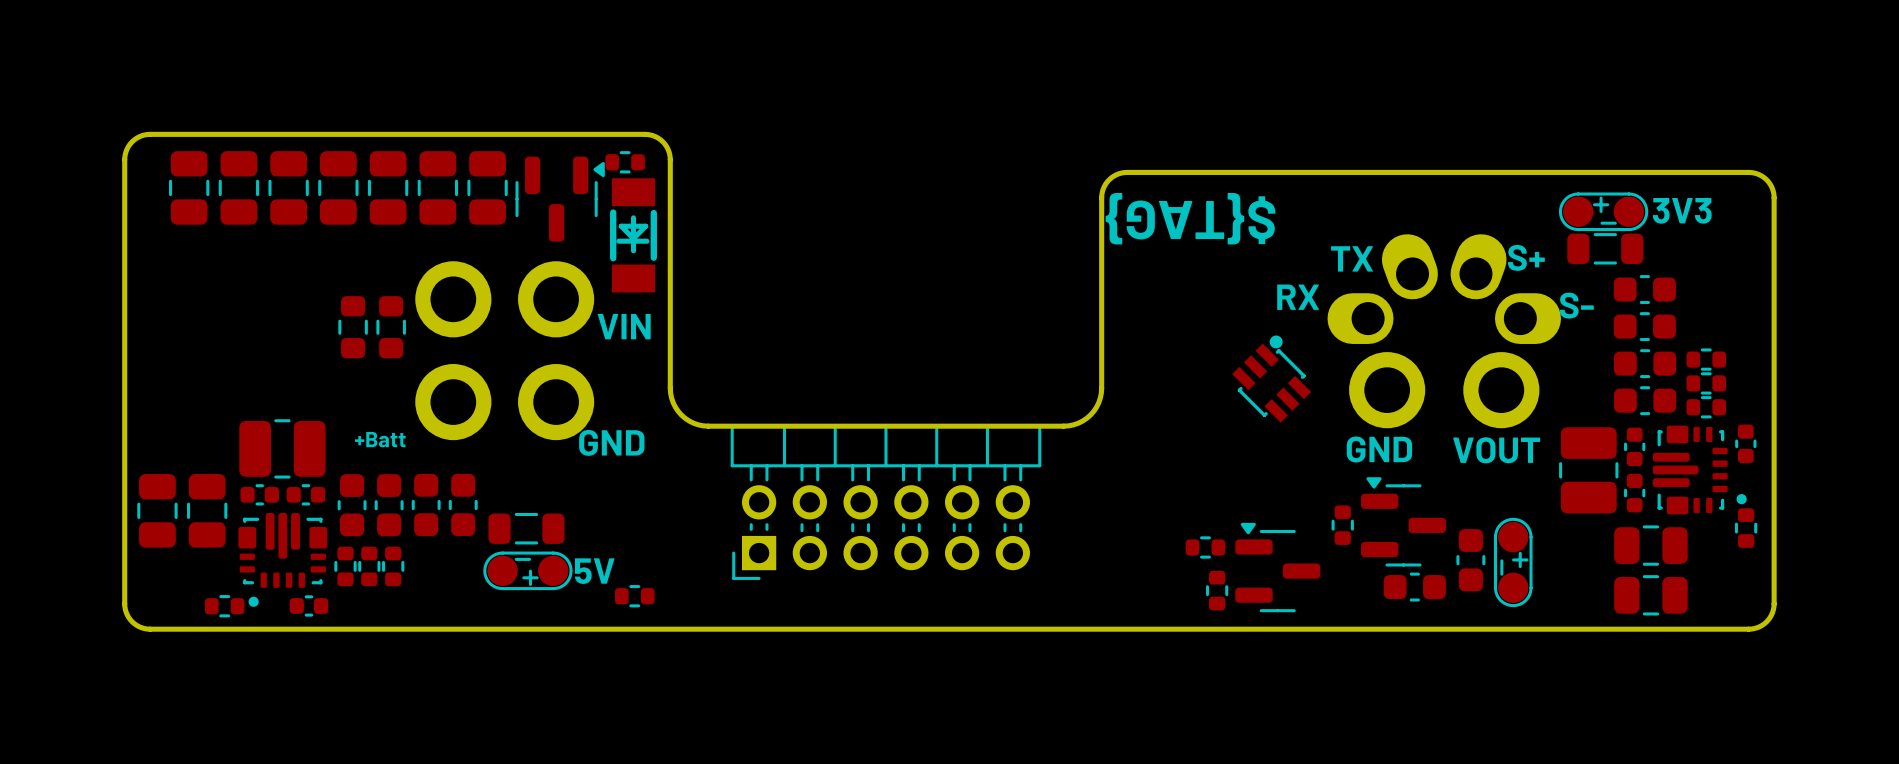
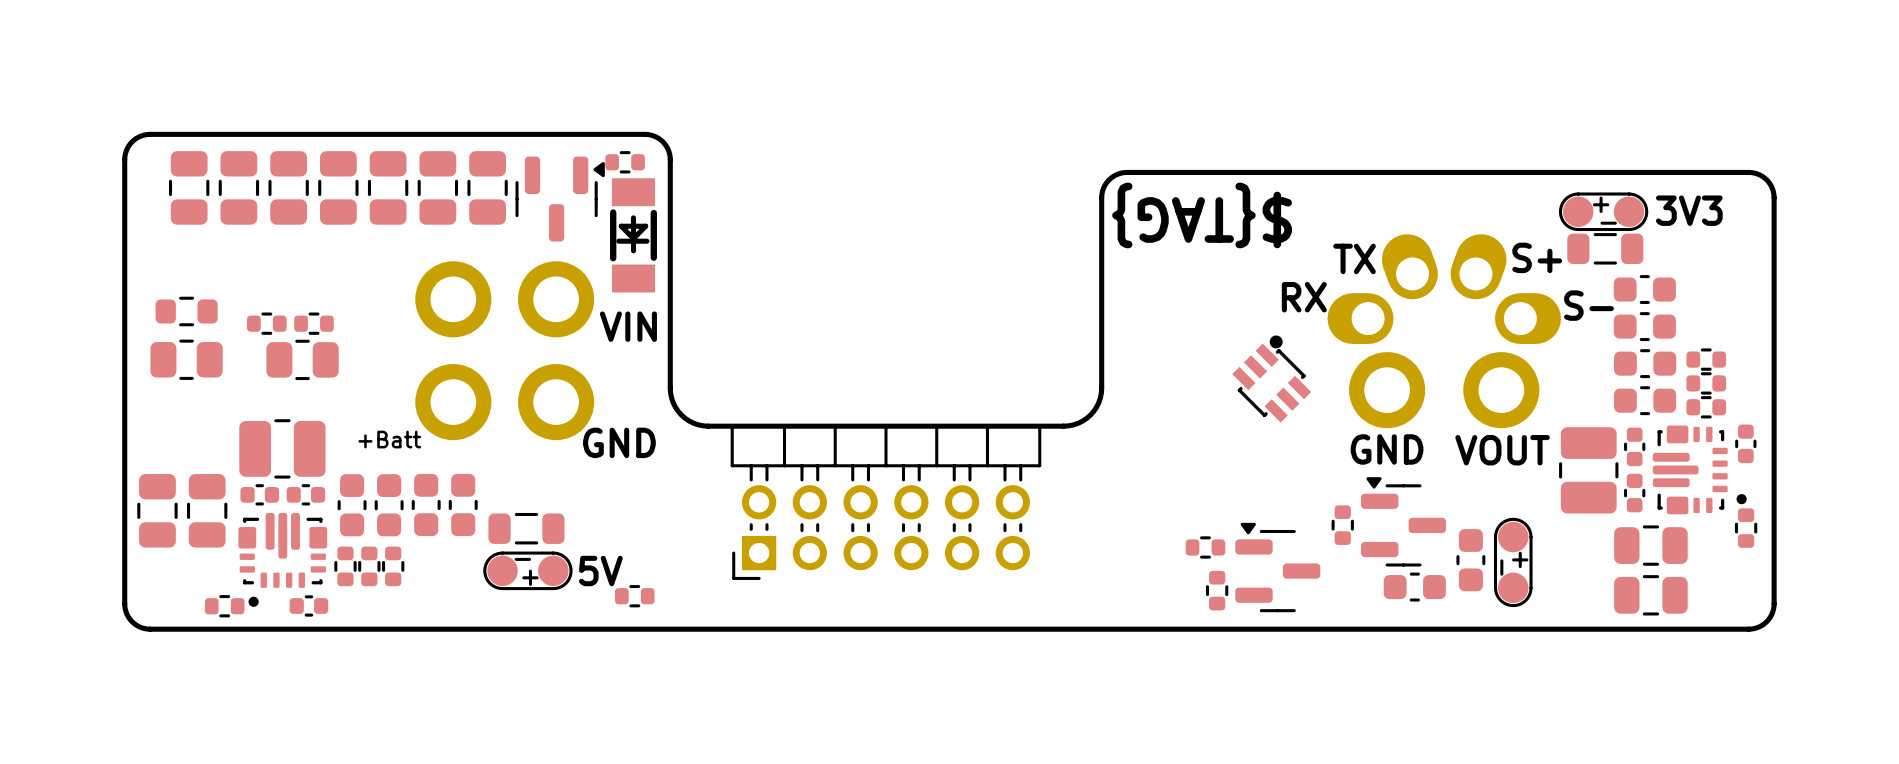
part: none -> (186, 311)
part: none -> (266, 323)
part: none -> (314, 323)
part: (353, 327) -> none
part: (391, 327) -> none
part: none -> (186, 359)
part: none -> (302, 359)

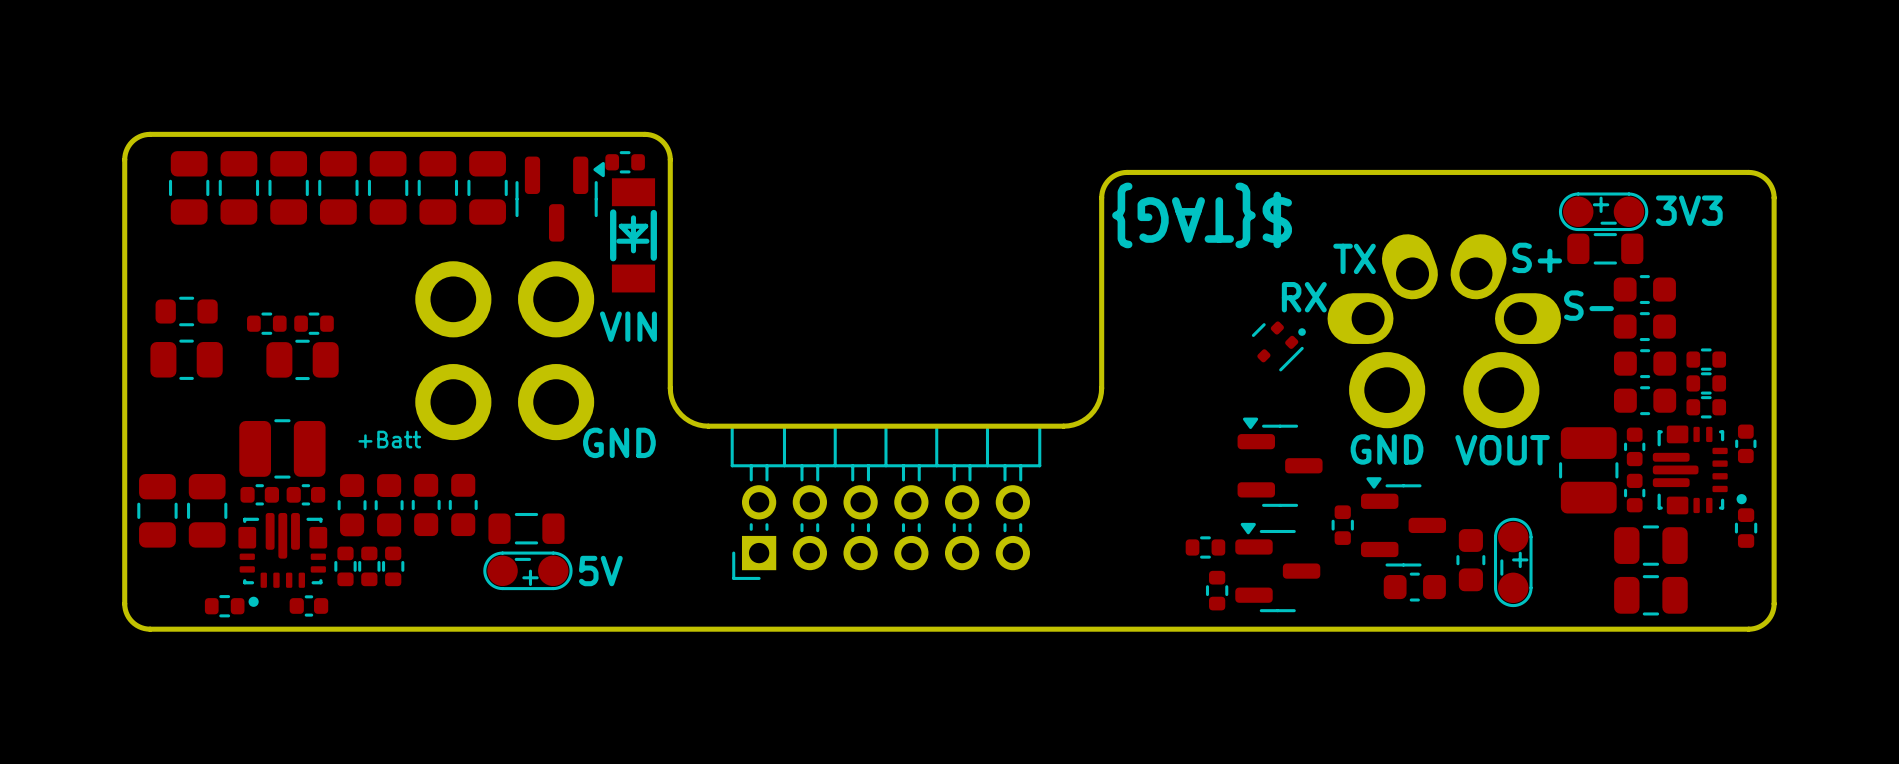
part: none -> (1278, 346)
part: (1271, 379) -> none
part: none -> (1280, 462)
part: (634, 596) -> none

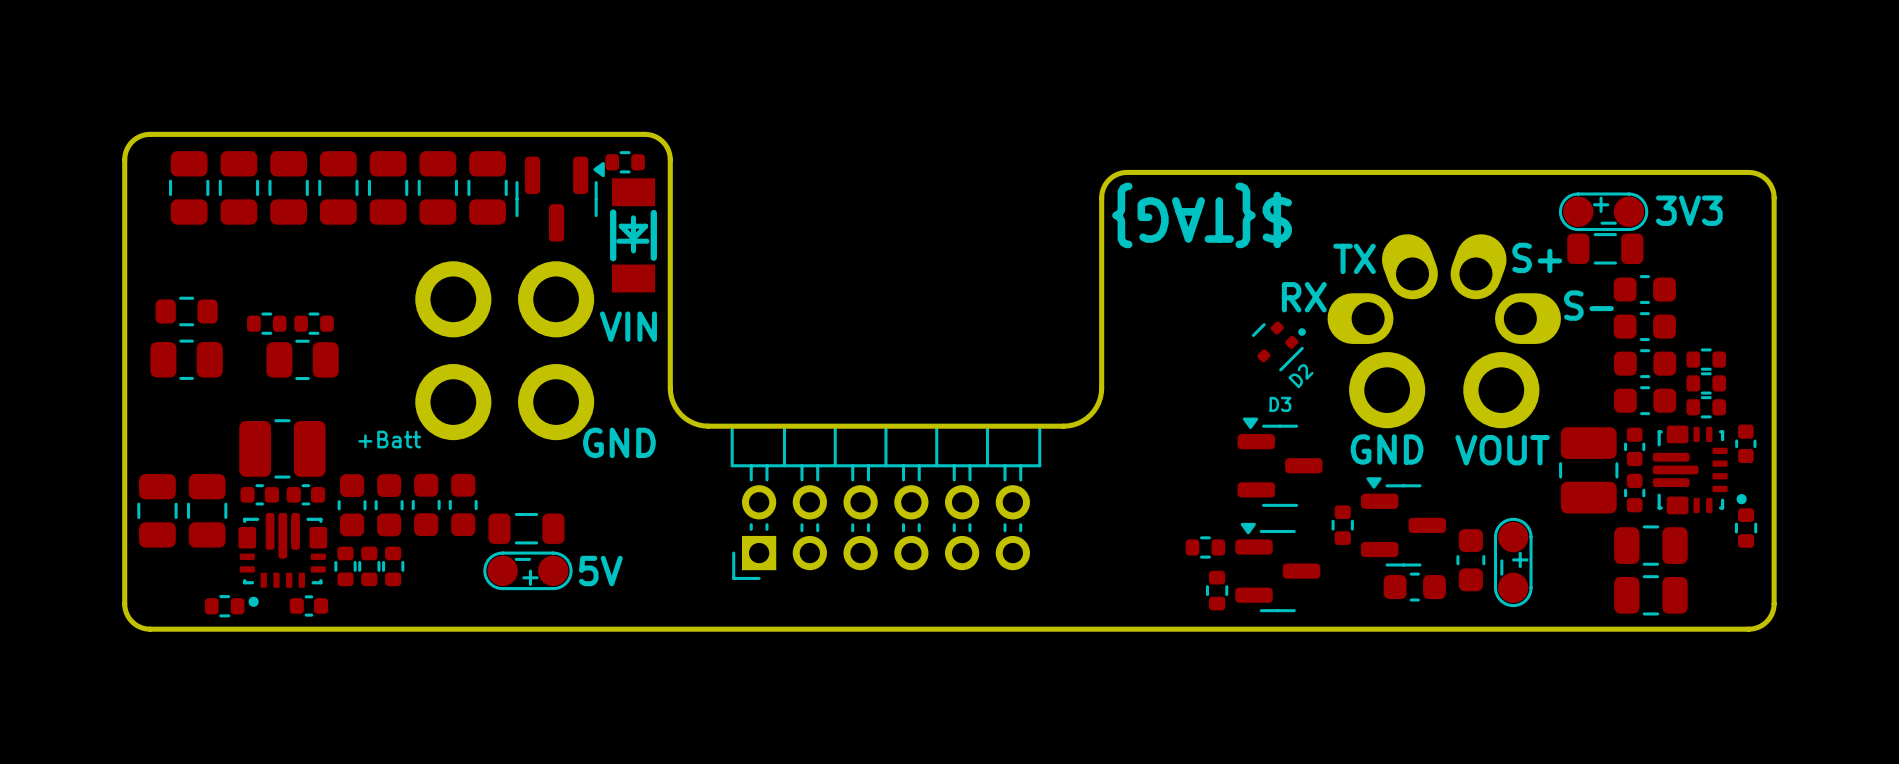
D2 name: none -> D2 (1301, 376)
D3 name: none -> D3 (1280, 404)

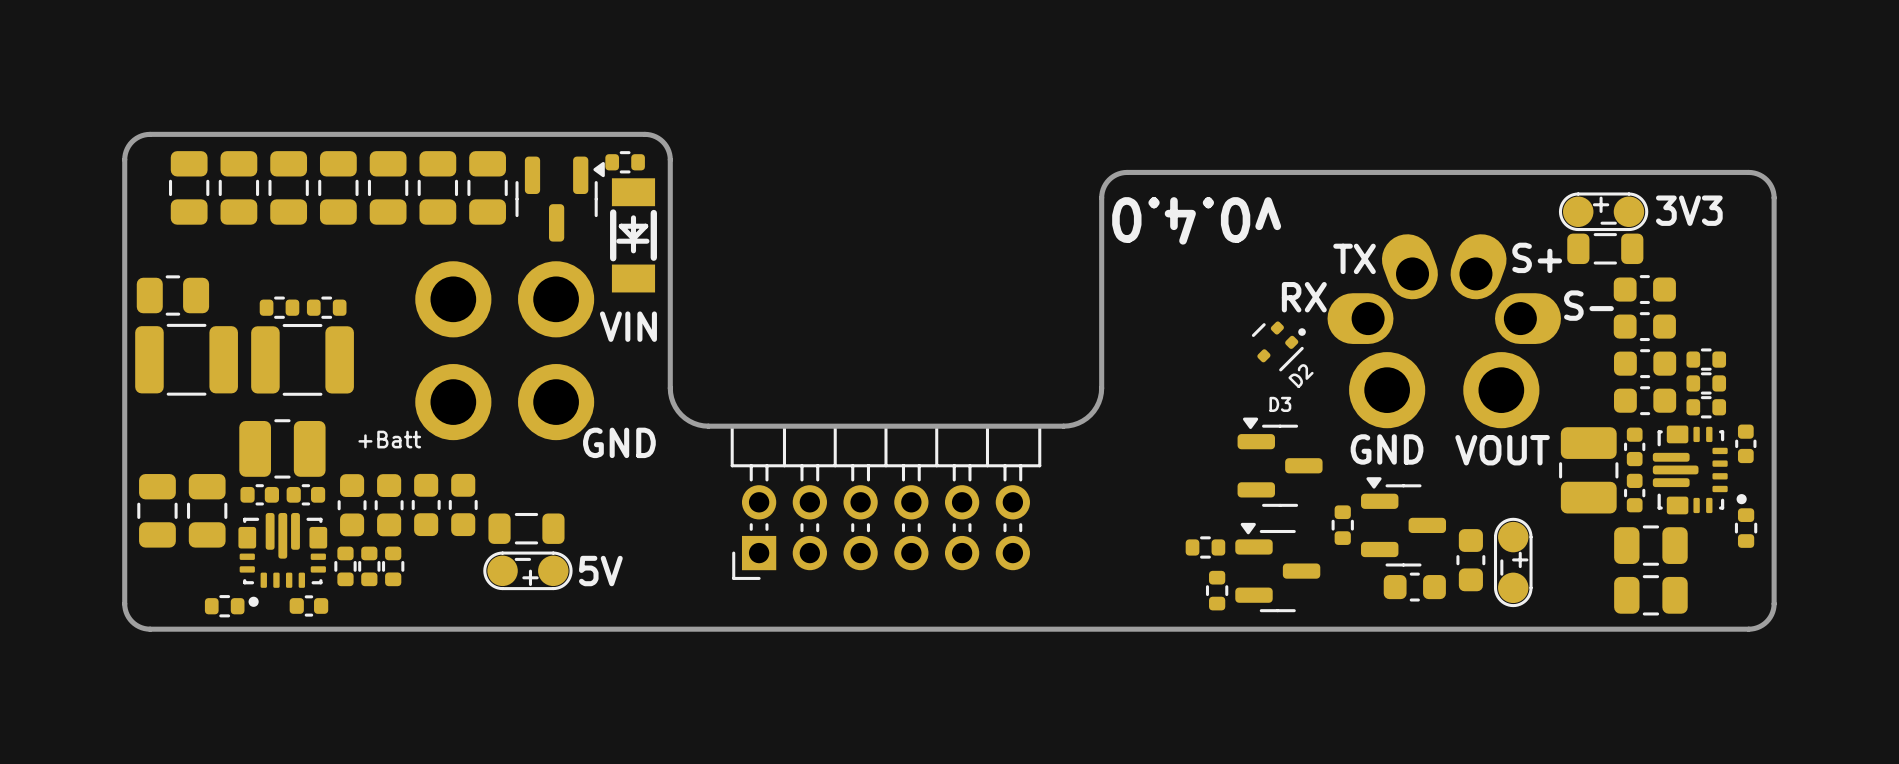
text: ${TAG} (1202, 215) -> v0.4.0 (1196, 220)
part footprint: [155, 296, 218, 327] -> [136, 275, 210, 316]
part: none -> (279, 307)
part: none -> (326, 307)
part: (266, 323) -> none
part: (314, 323) -> none
part footprint: [150, 339, 223, 380] -> [135, 323, 238, 396]
part footprint: [266, 339, 339, 381] -> [251, 323, 354, 396]

